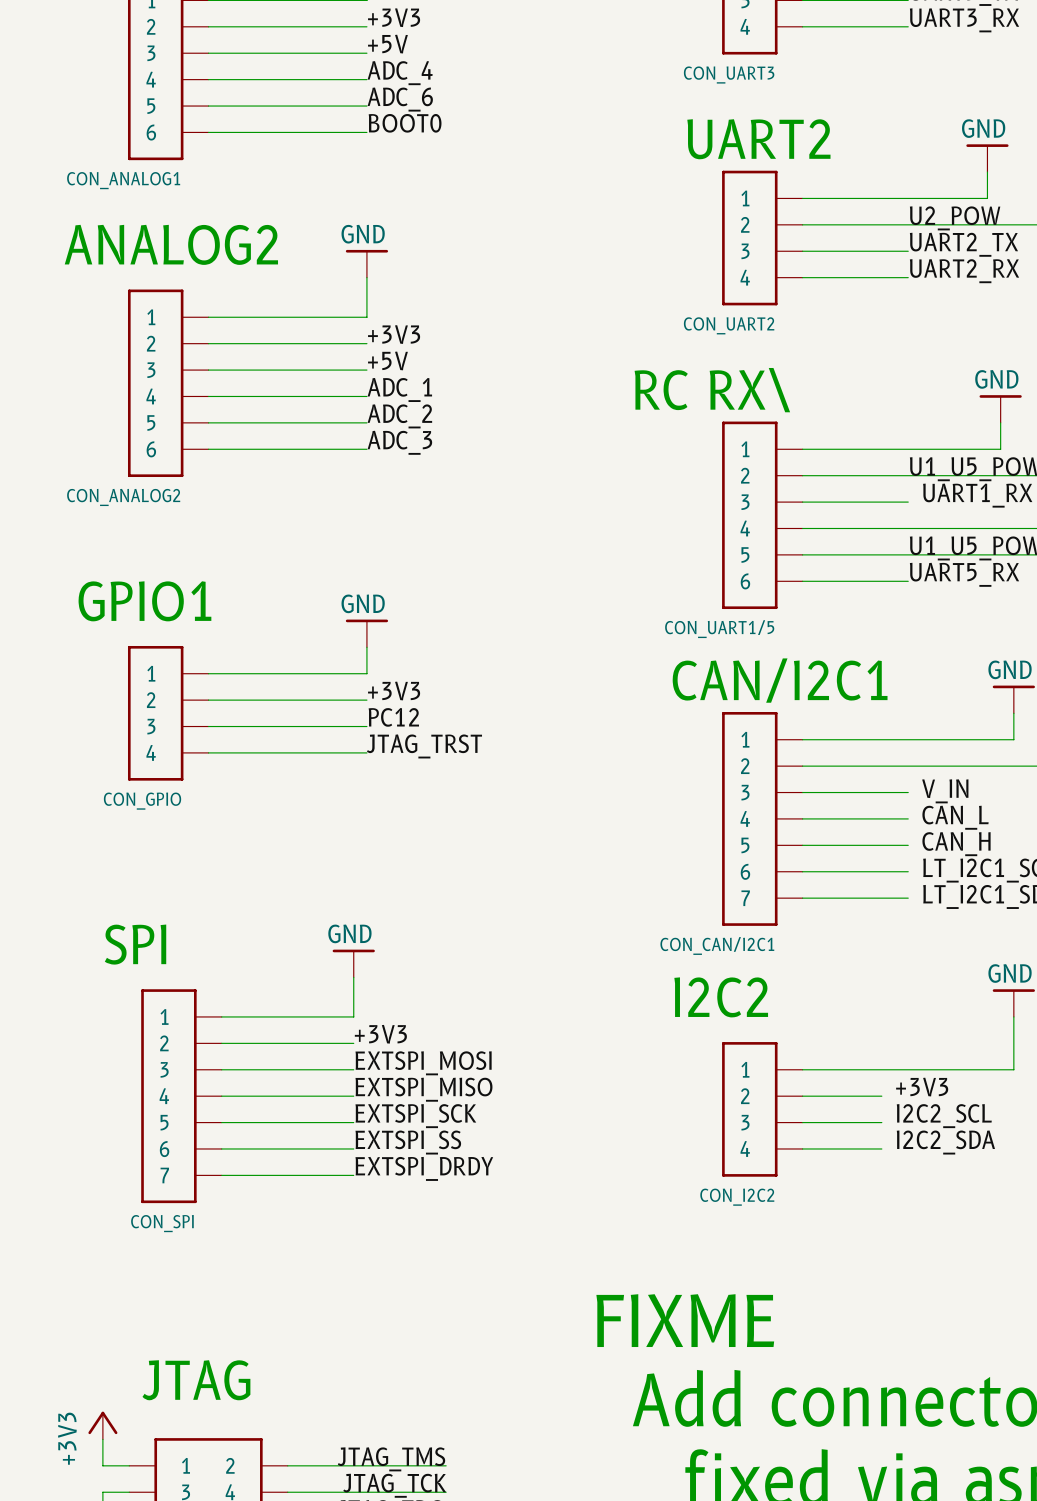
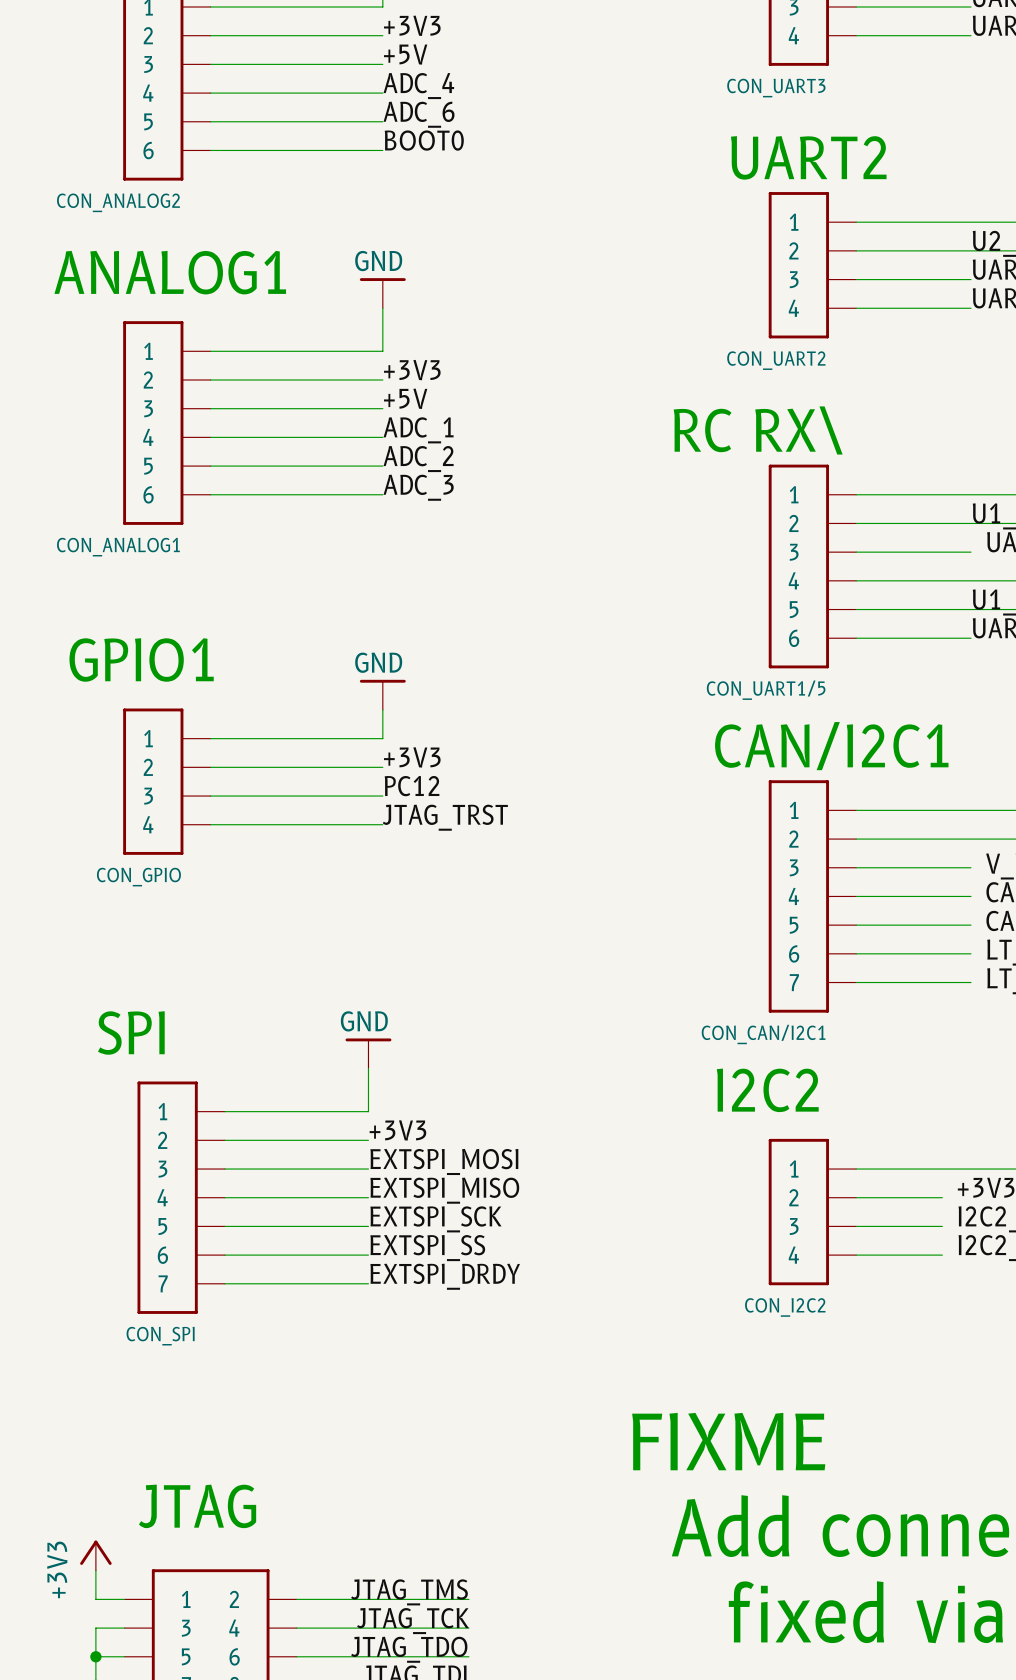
CON_ANALOG1 name: CON_ANALOG1 (123, 180) -> CON_ANALOG2 (118, 202)
text: ANALOG2 (171, 244) -> ANALOG1 (170, 272)
CON_ANALOG2 name: CON_ANALOG2 (123, 497) -> CON_ANALOG1 (118, 547)

